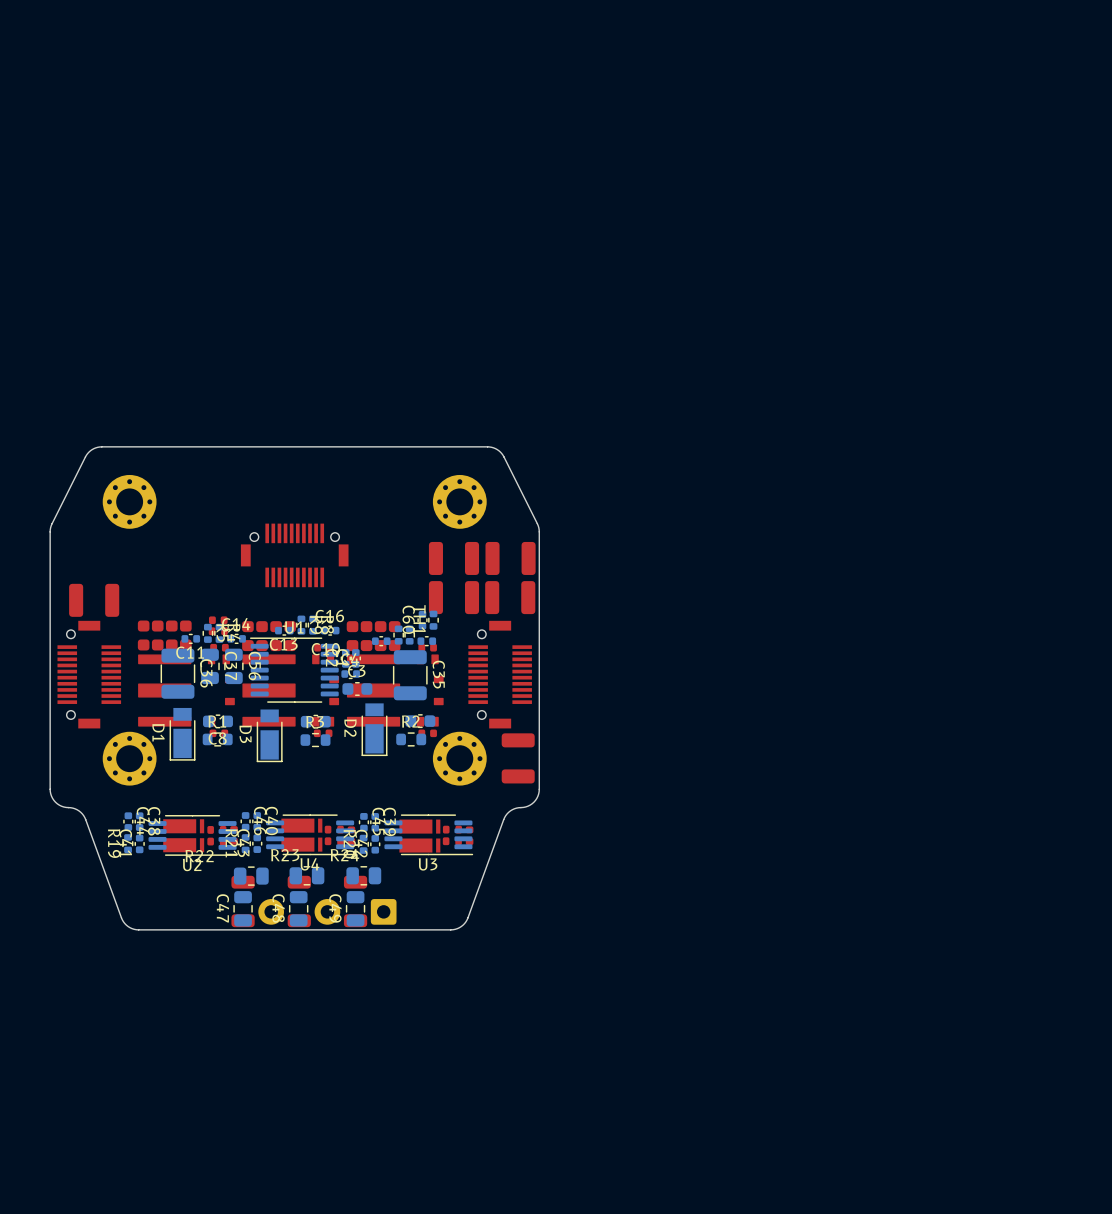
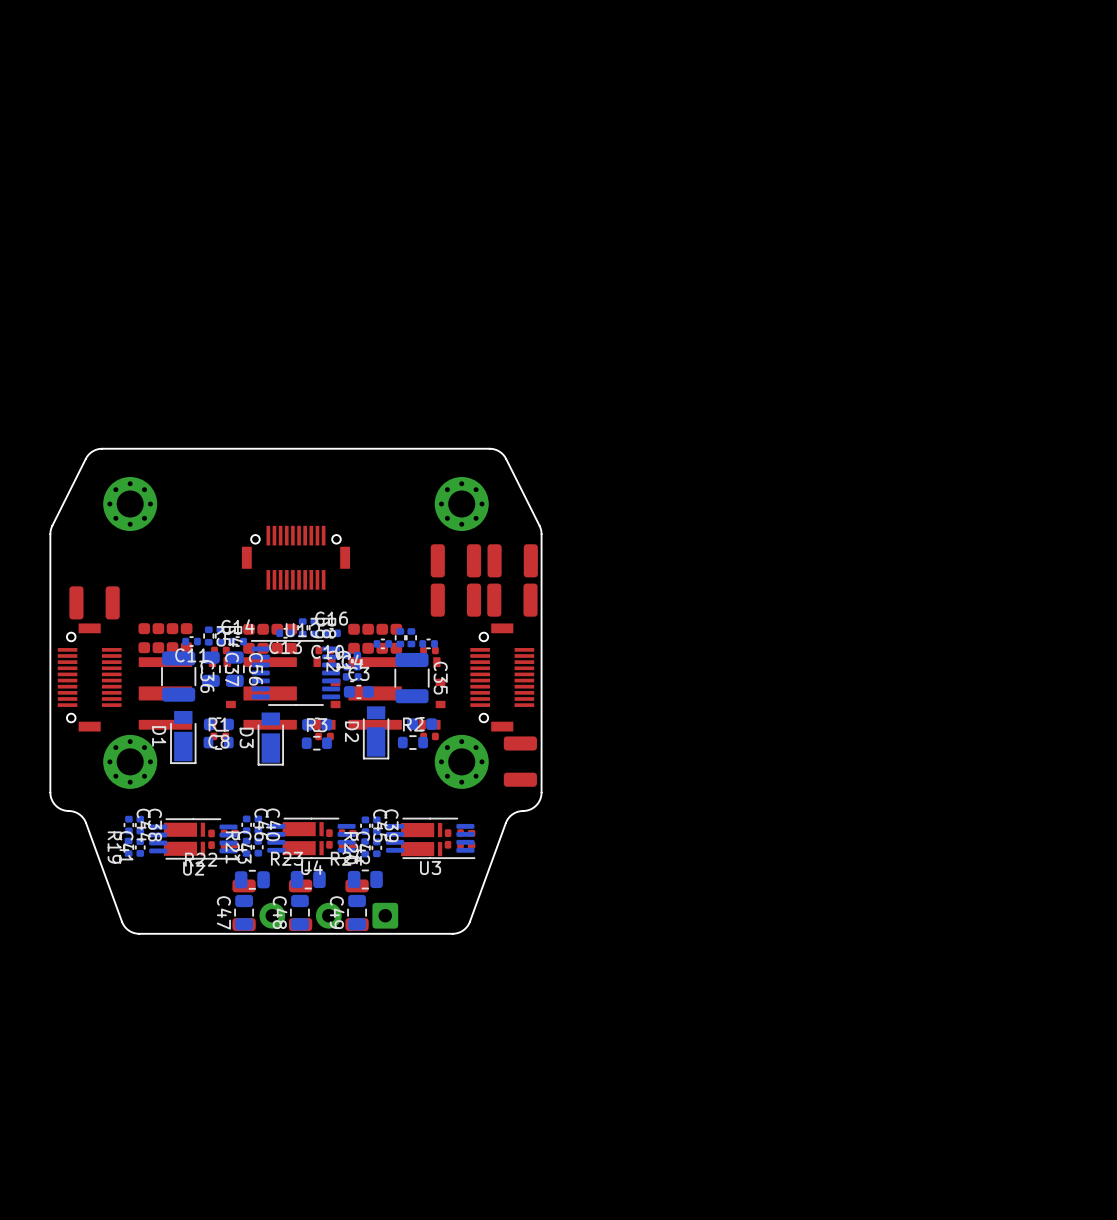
part: (218, 620) -> none
C60: (422, 620) -> none
TH1: (433, 620) -> none
part: (218, 631) -> none

